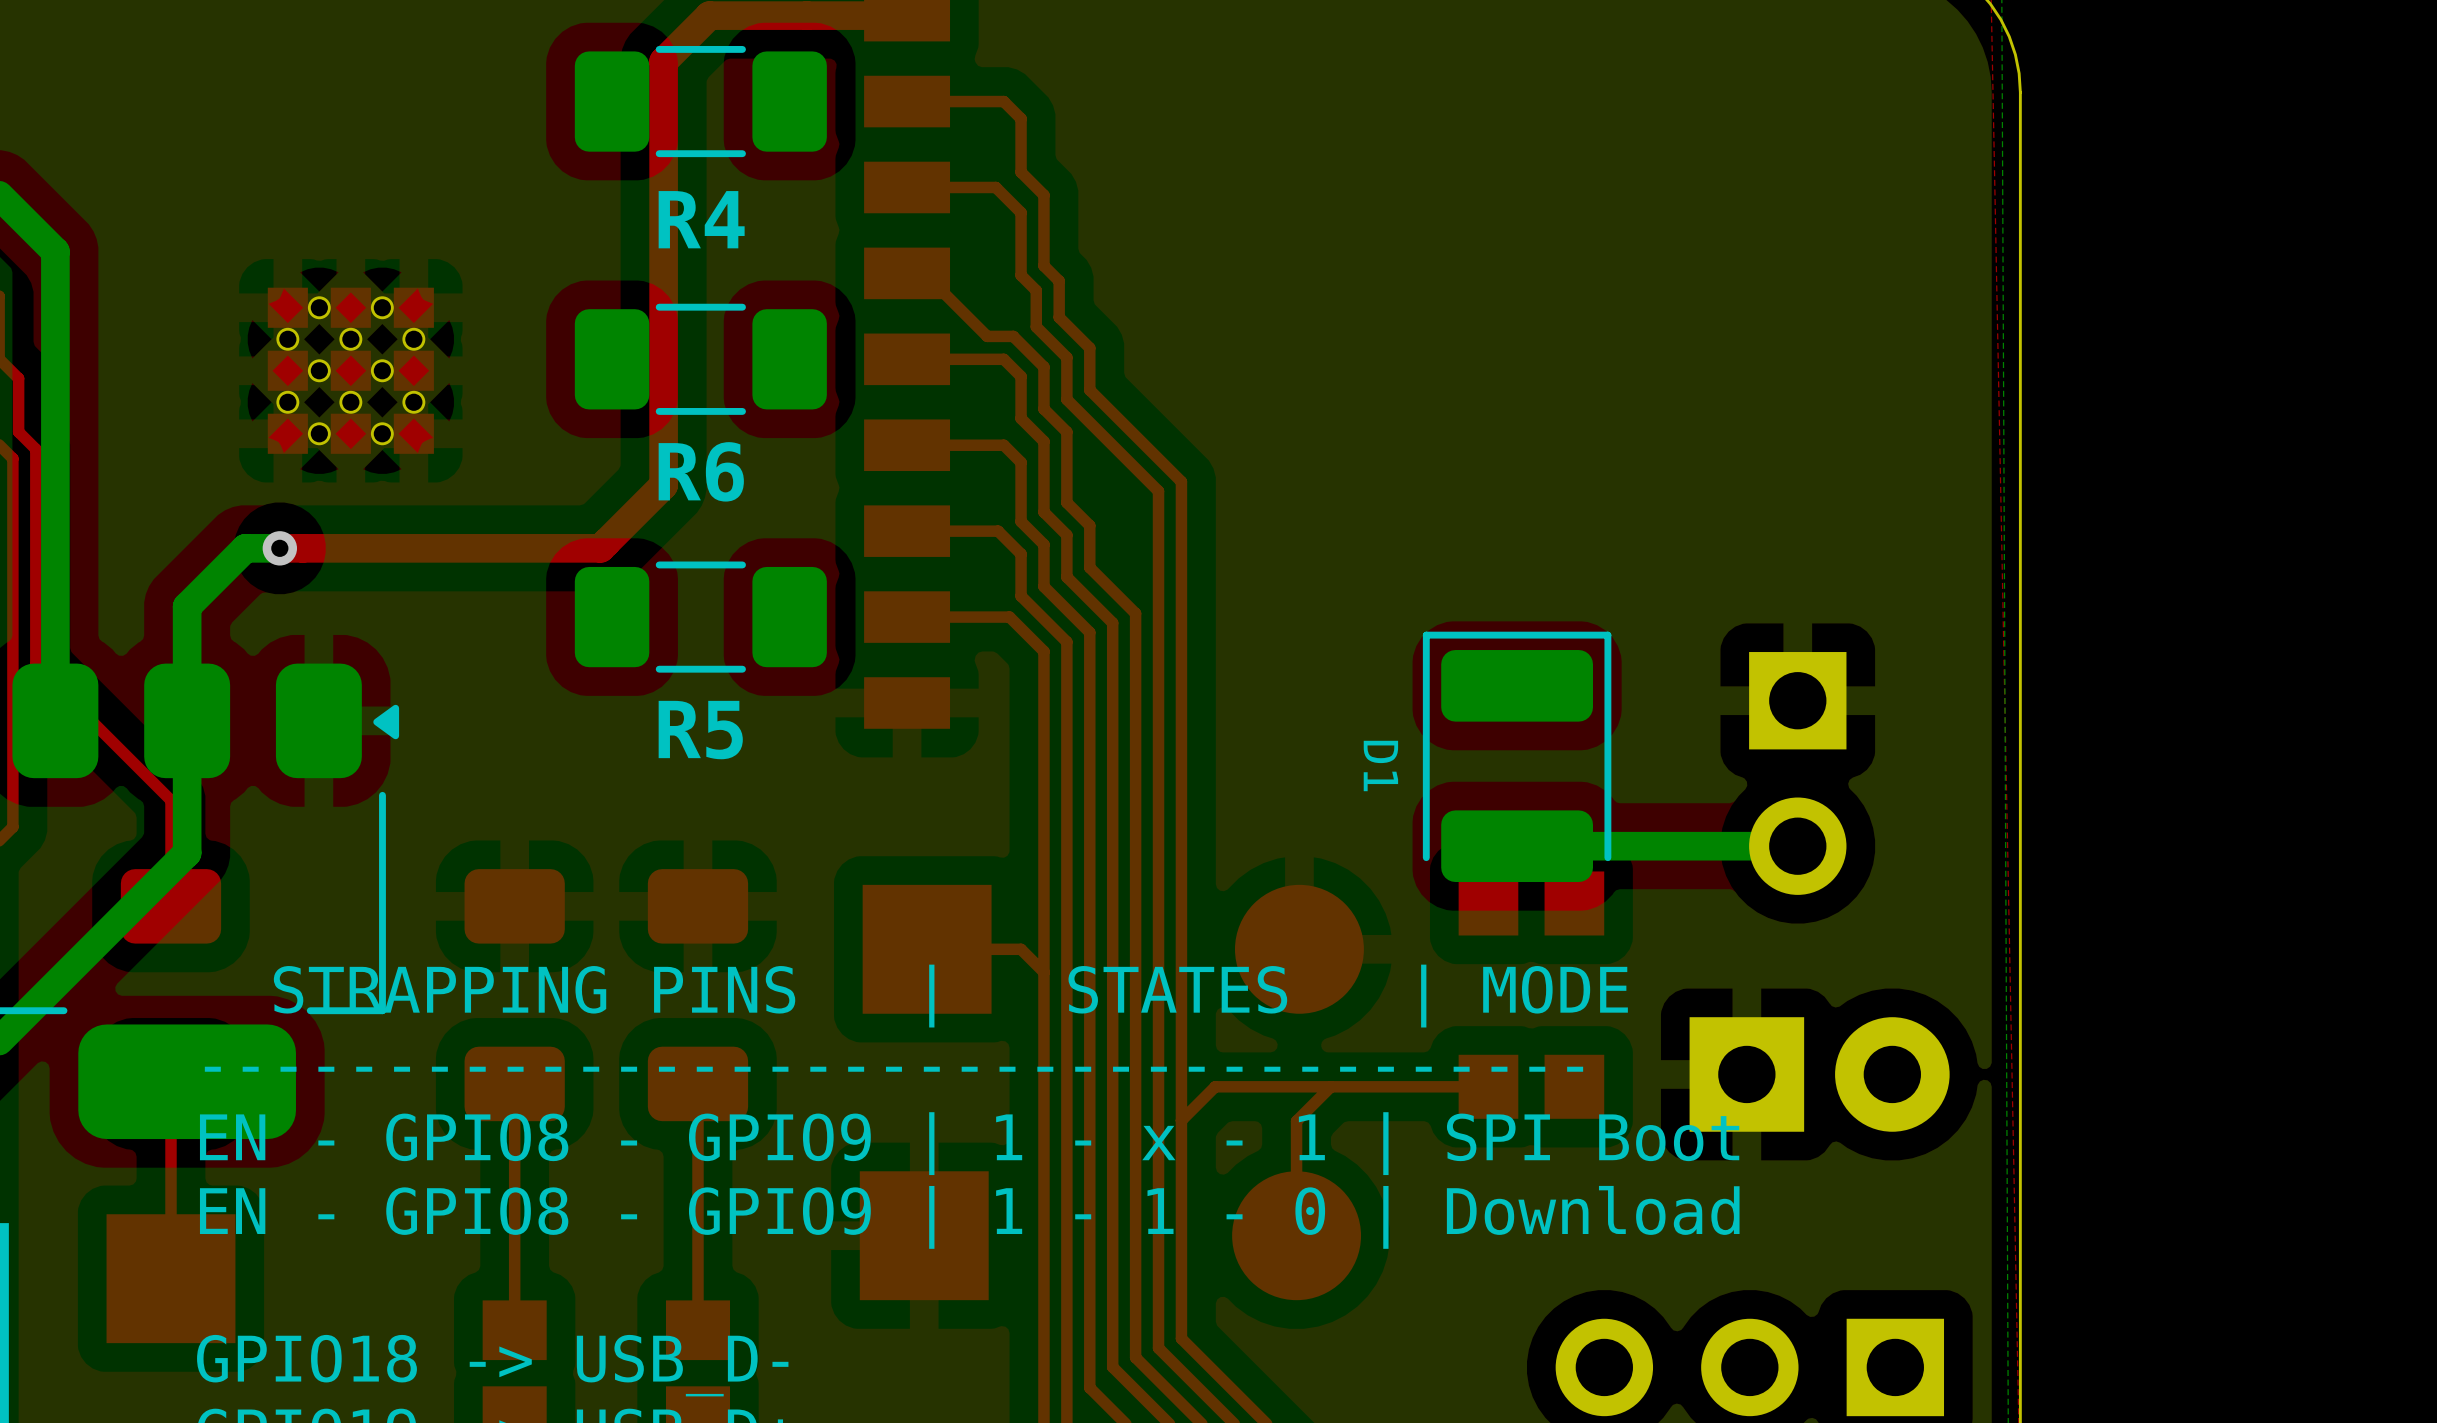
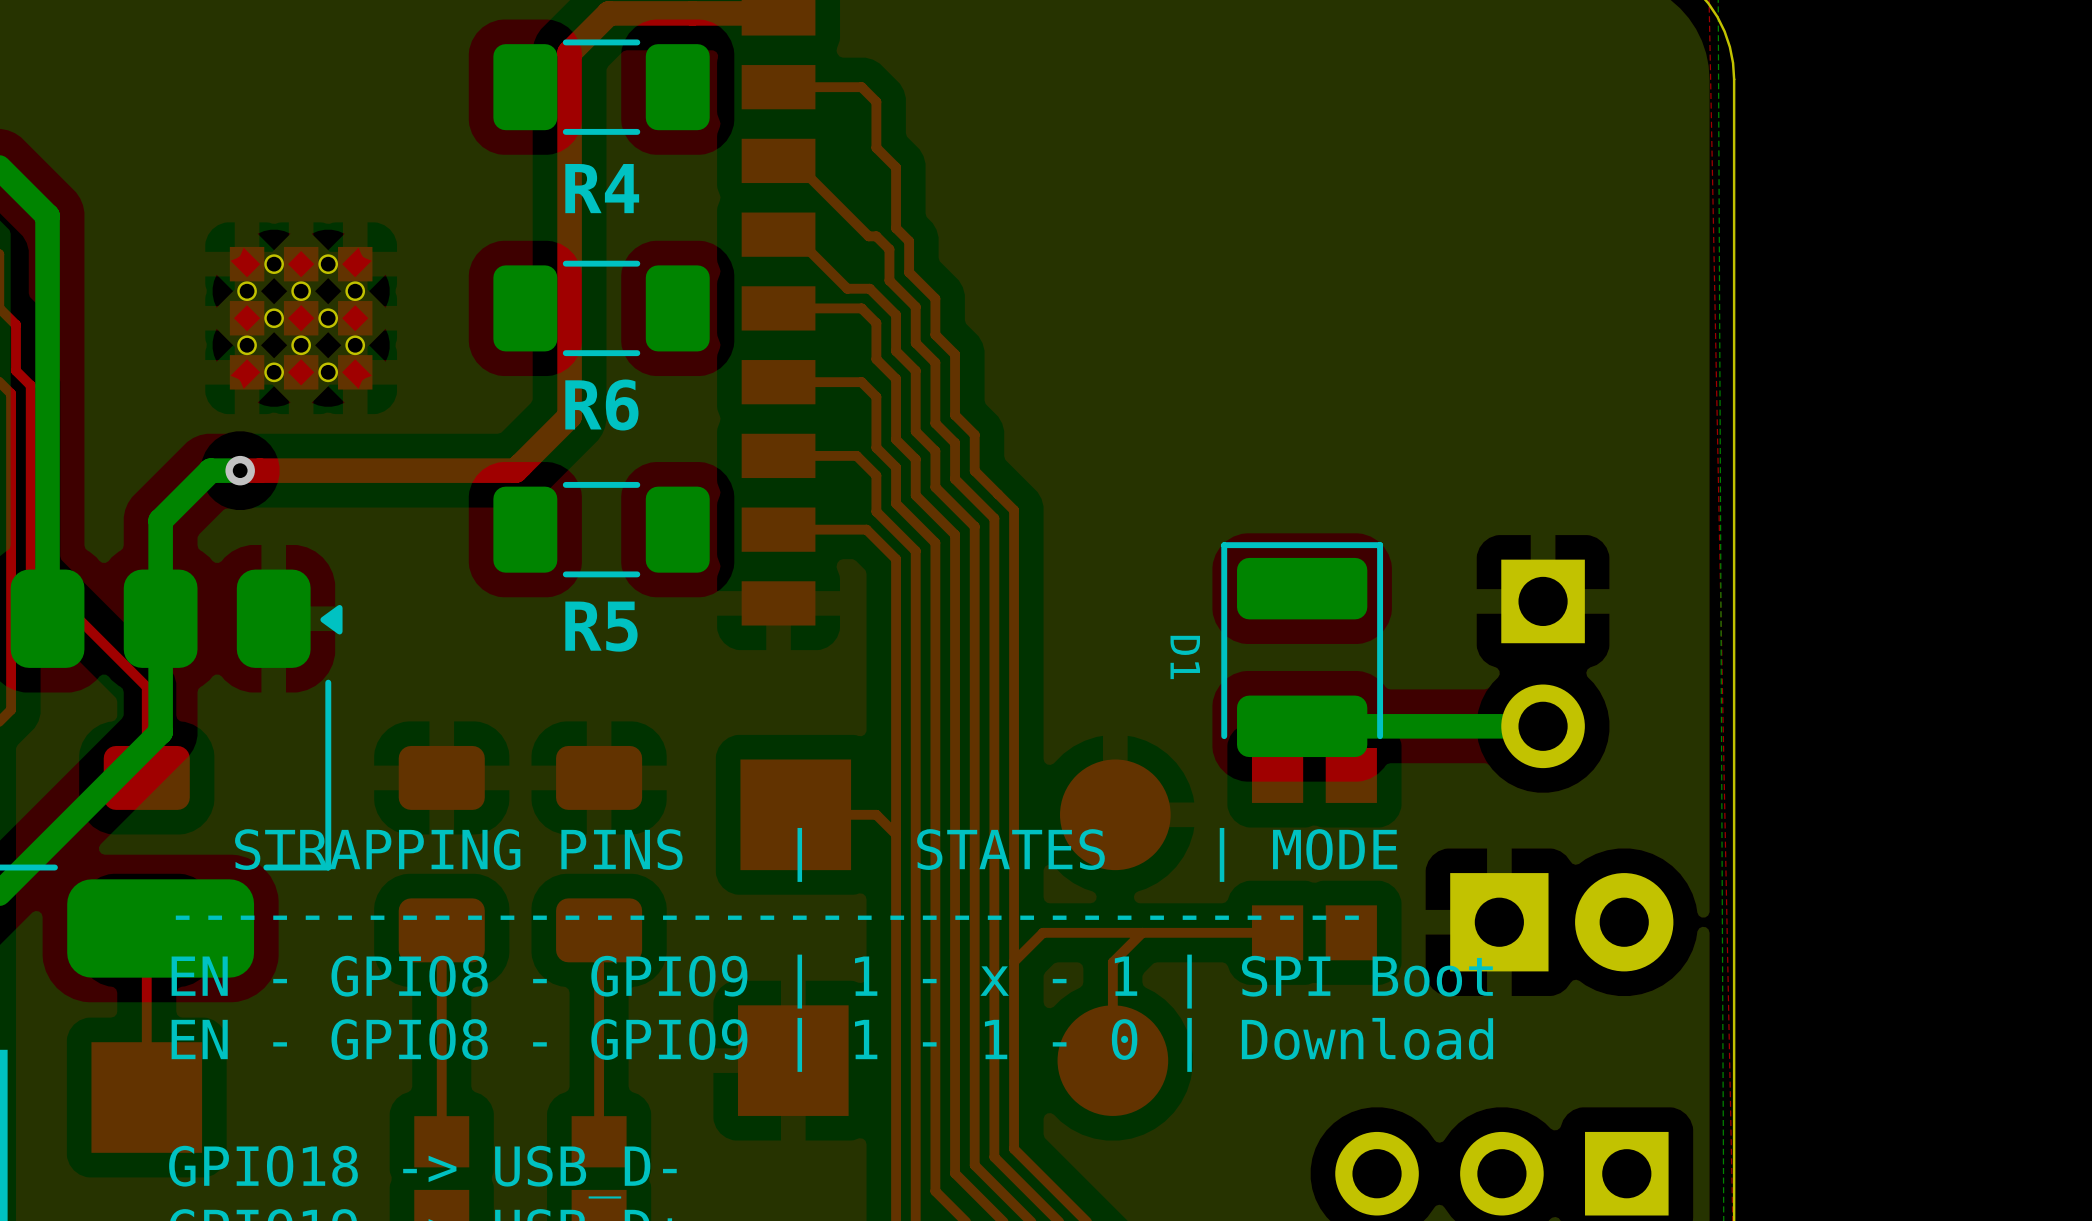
top track: (924, 187) (995, 187) (1021, 212) (1021, 275) -> (793, 160) (868, 236) (876, 236)
top track: (1112, 413) (1181, 481) (1181, 594) -> (955, 354) (955, 415) (974, 434) (974, 470) (1014, 510)
top track: (1089, 422) (1158, 491) (1158, 603) -> (935, 362) (935, 423) (955, 442) (955, 479) (994, 518)

